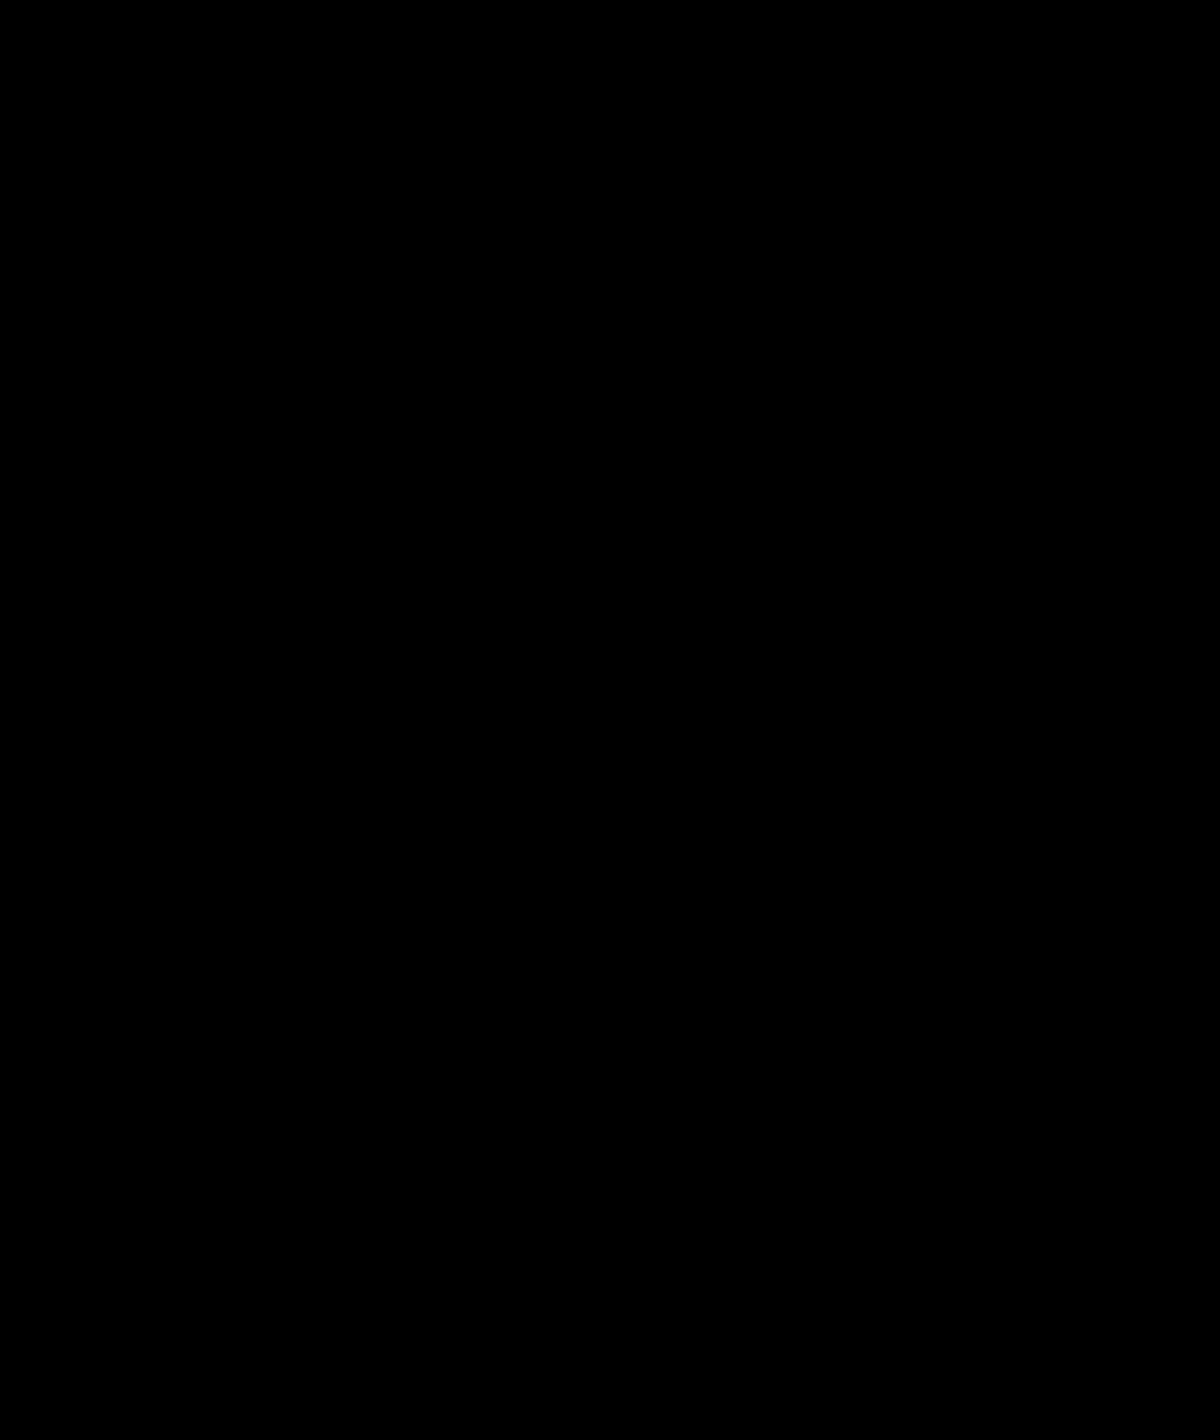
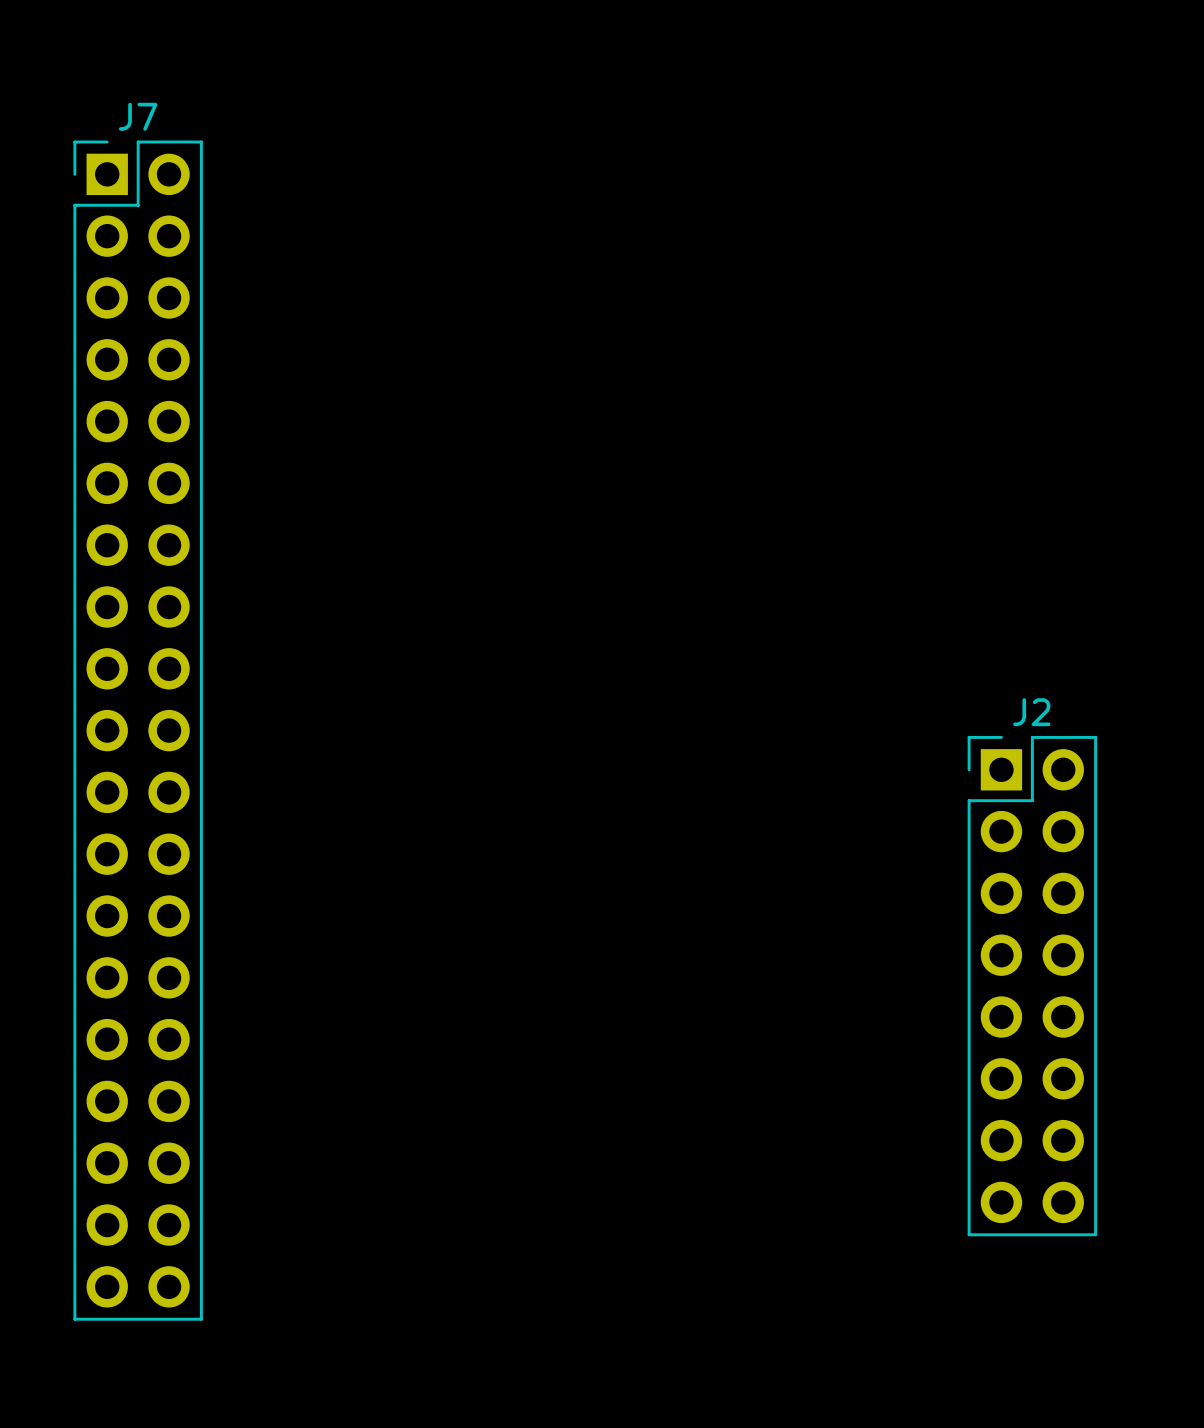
J7: none -> (138, 730)
J2: none -> (1032, 986)

